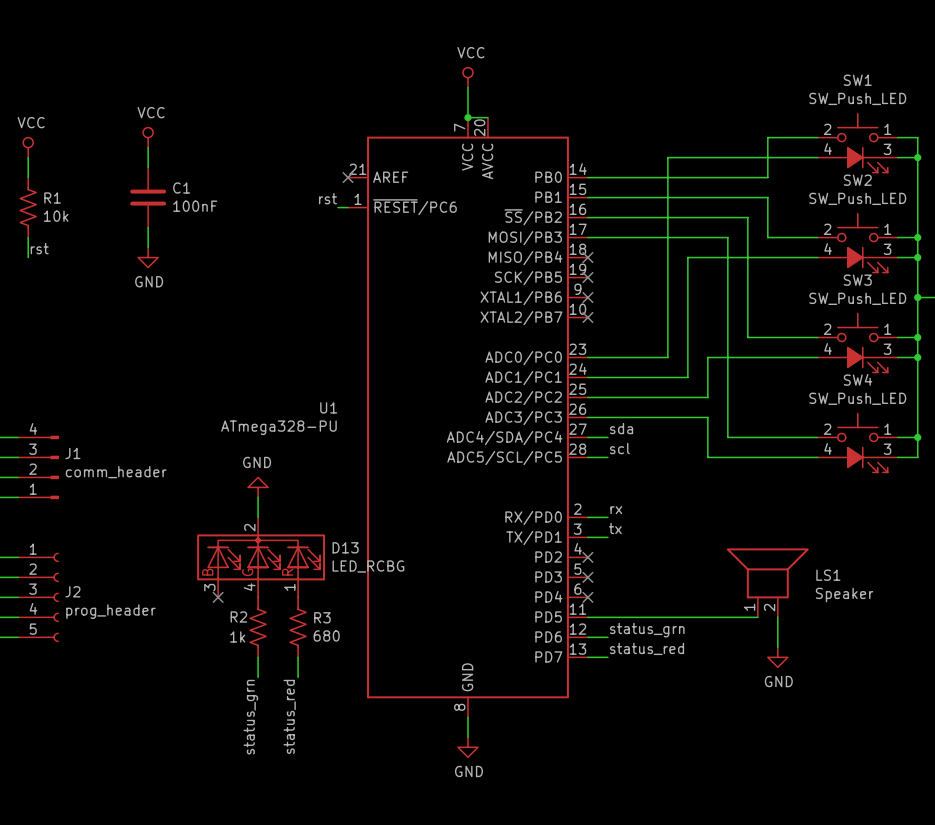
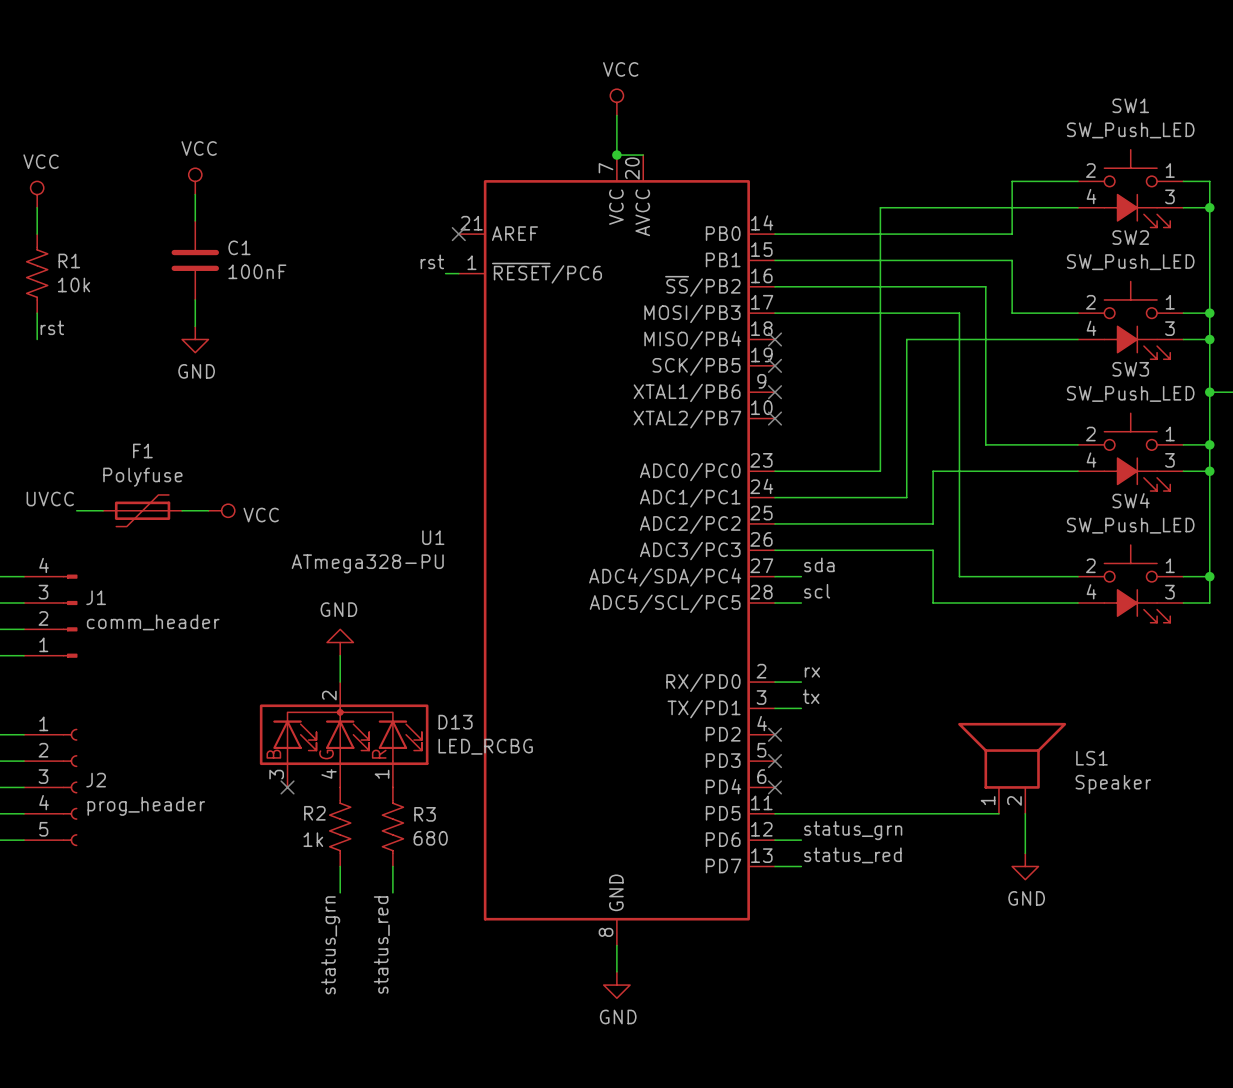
label: none -> UVCC (50, 499)
wire: none -> (76, 510) (103, 510)
F1: none -> Polyfuse (142, 510)
wire: none -> (182, 510) (208, 510)
power symbol: none -> VCC (221, 510)

